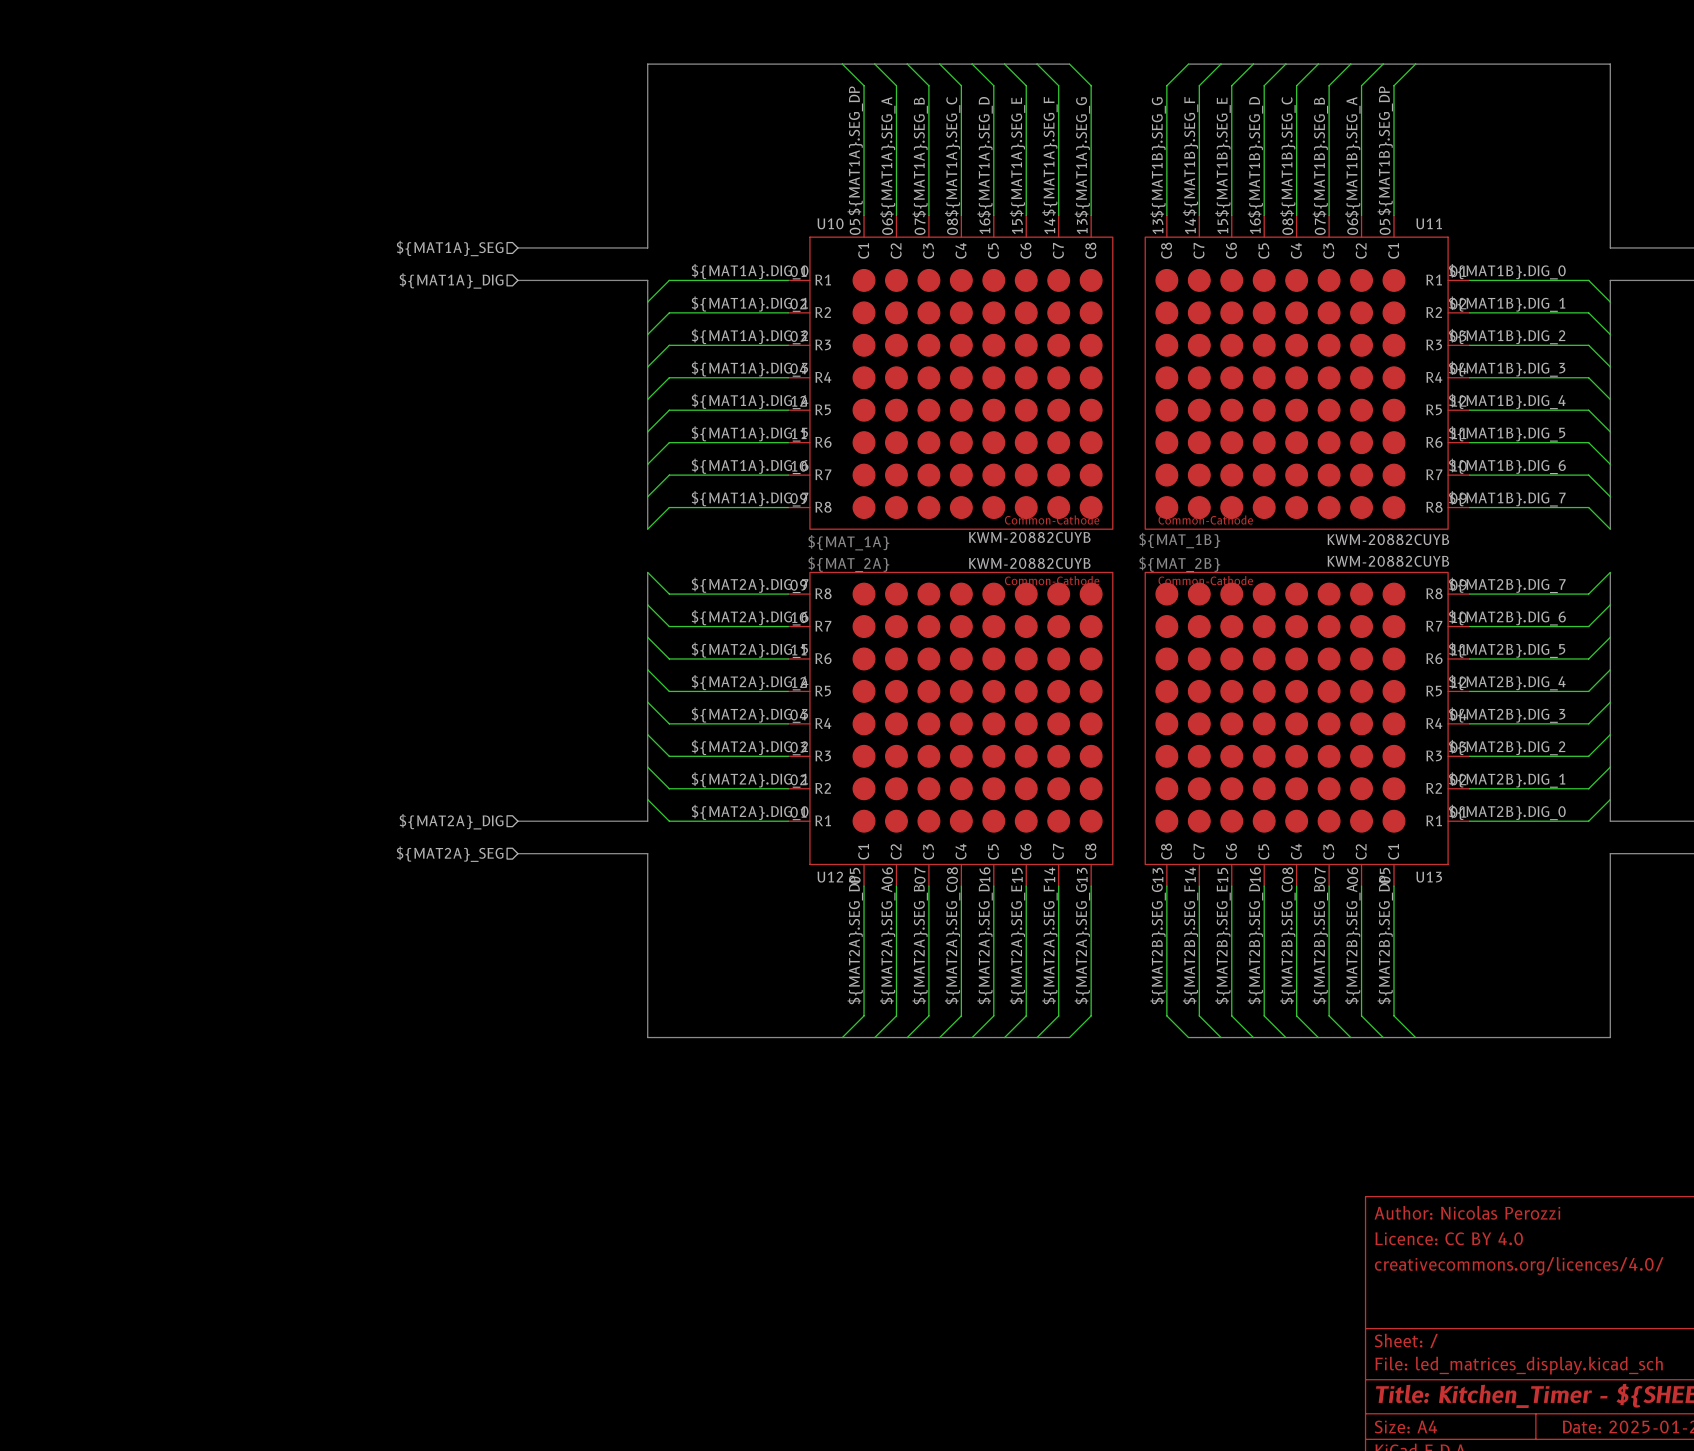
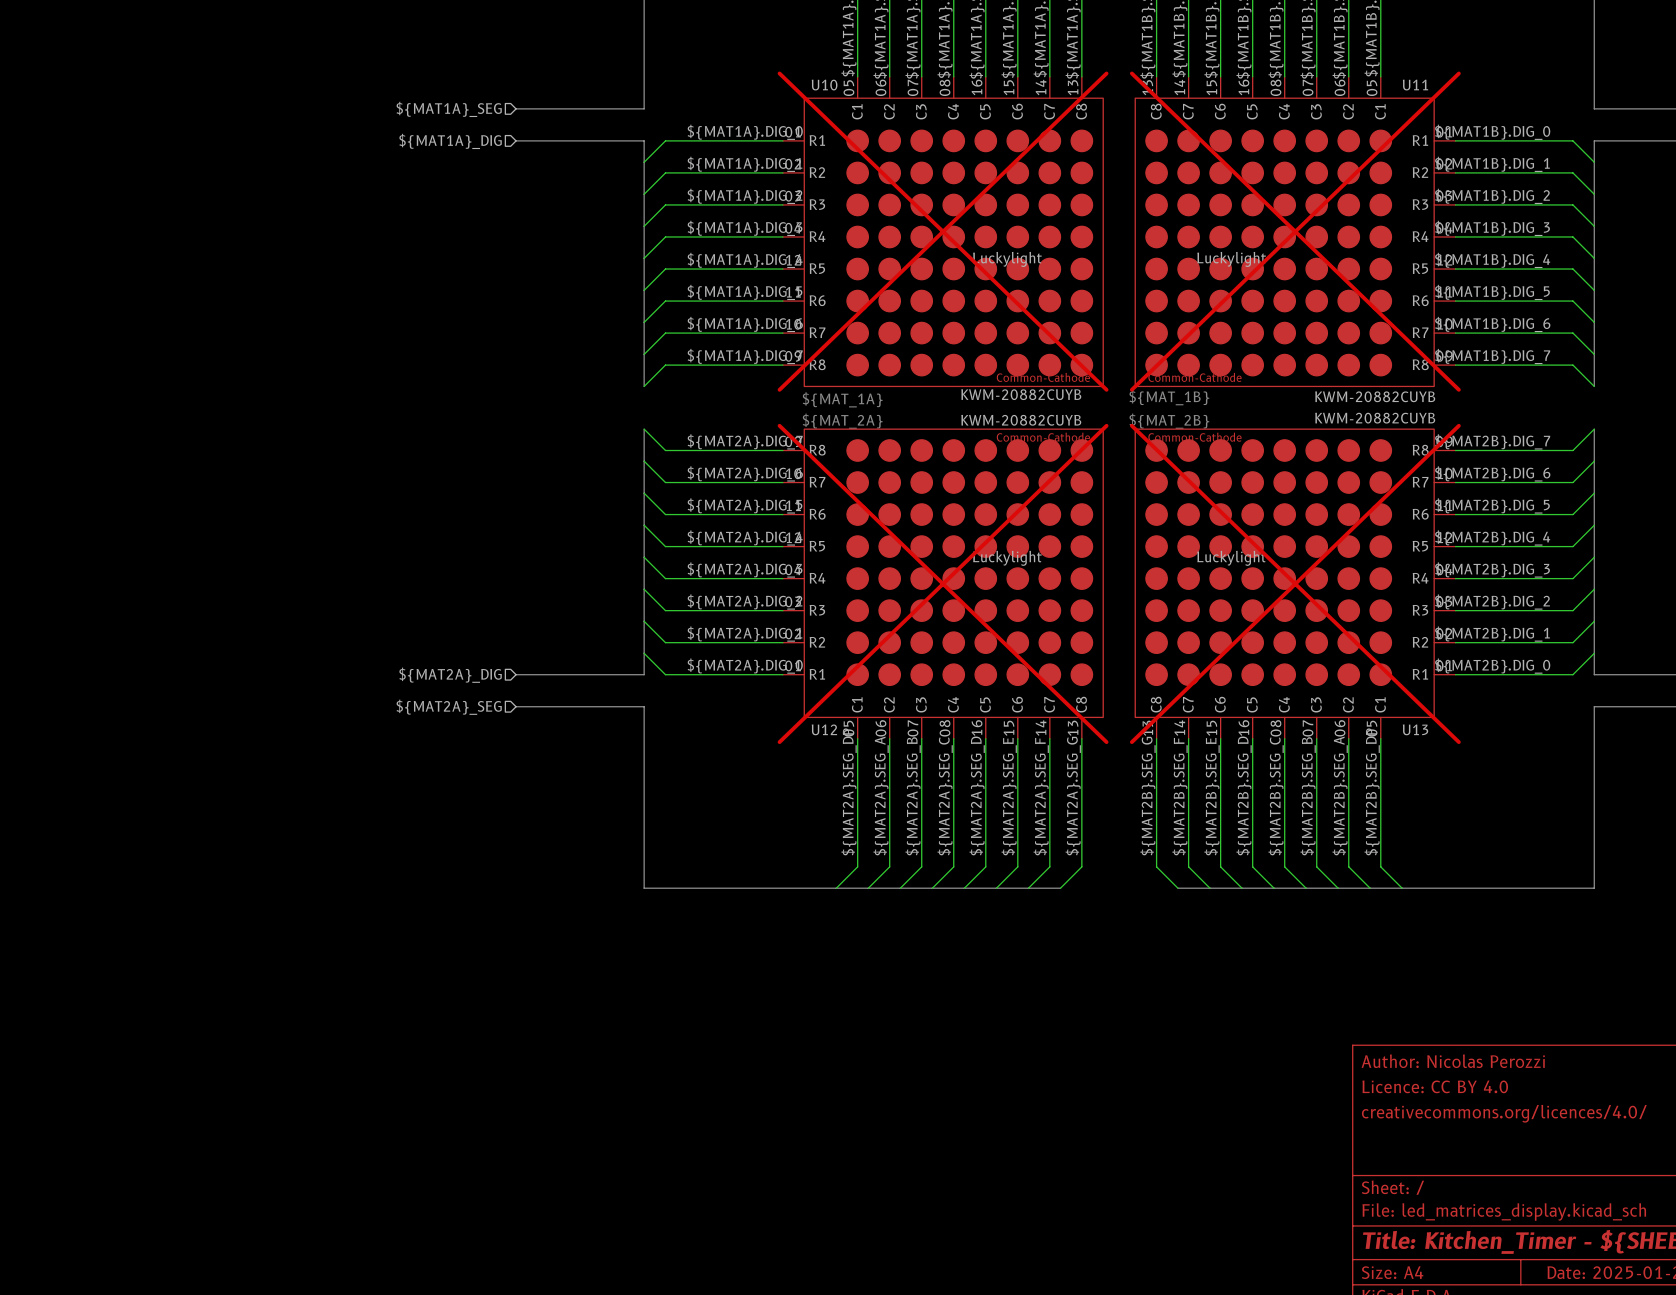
U10 do-not-place cross: none -> (943, 231)
U11 do-not-place cross: none -> (1295, 231)
U10 text: none -> Luckylight (1007, 259)
U11 text: none -> Luckylight (1231, 259)
U12 text: none -> Luckylight (1007, 558)
U13 text: none -> Luckylight (1231, 558)
U12 do-not-place cross: none -> (943, 583)
U13 do-not-place cross: none -> (1295, 583)

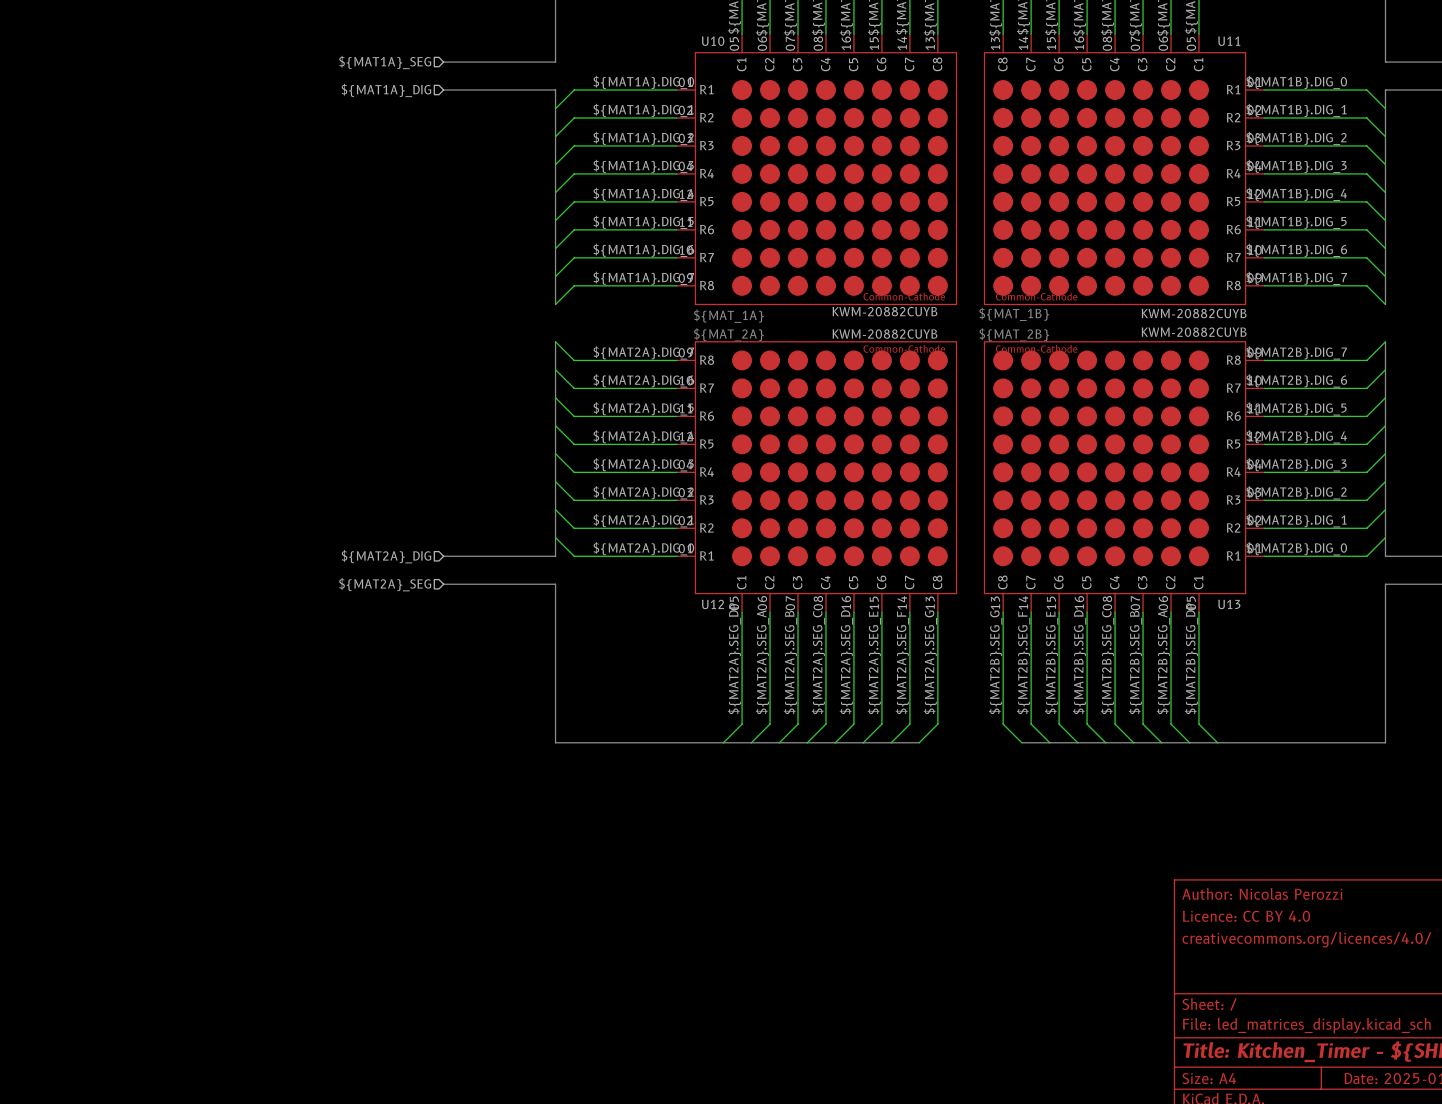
U10 do-not-place cross: (943, 231) -> none
U11 do-not-place cross: (1295, 231) -> none
U10 text: Luckylight (1007, 259) -> none
U11 text: Luckylight (1231, 259) -> none
U12 text: Luckylight (1007, 558) -> none
U13 text: Luckylight (1231, 558) -> none
U12 do-not-place cross: (943, 583) -> none
U13 do-not-place cross: (1295, 583) -> none

